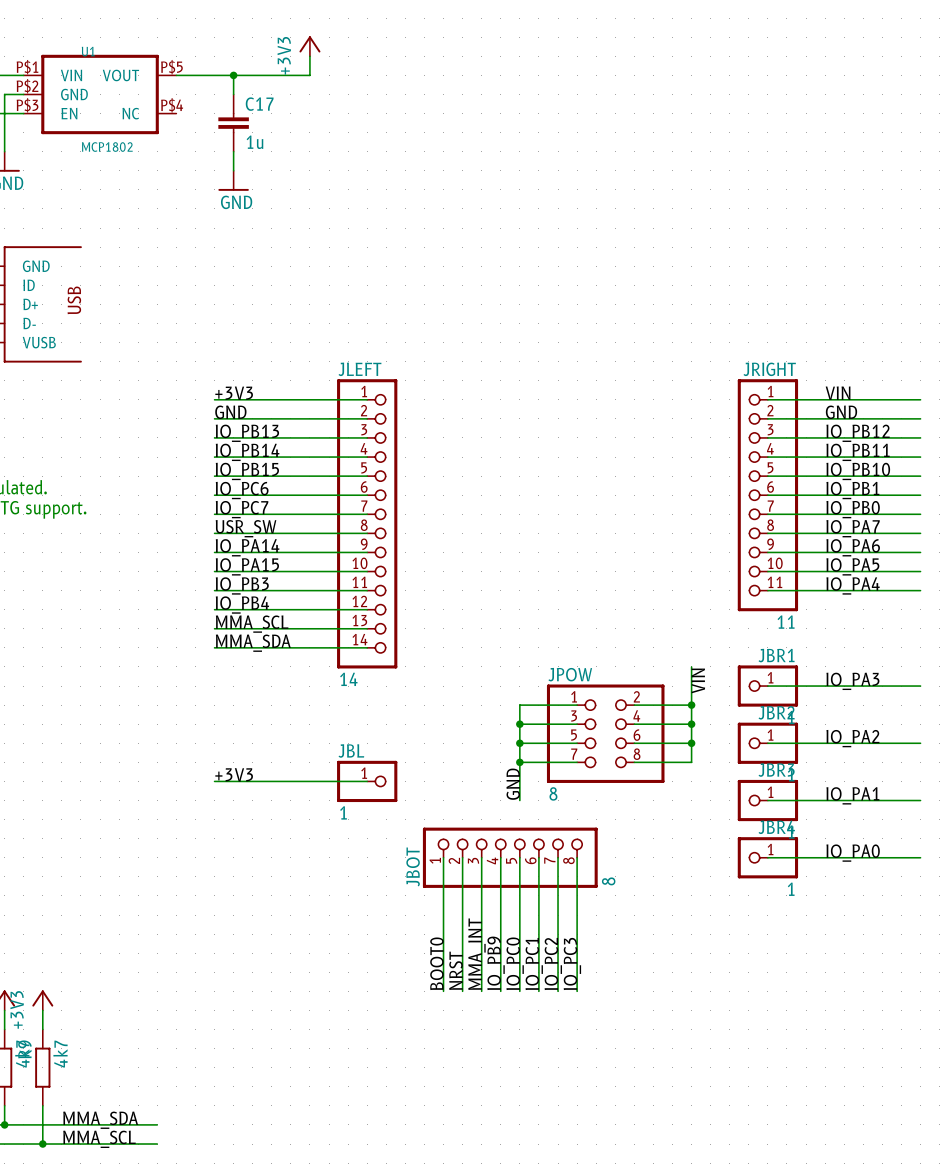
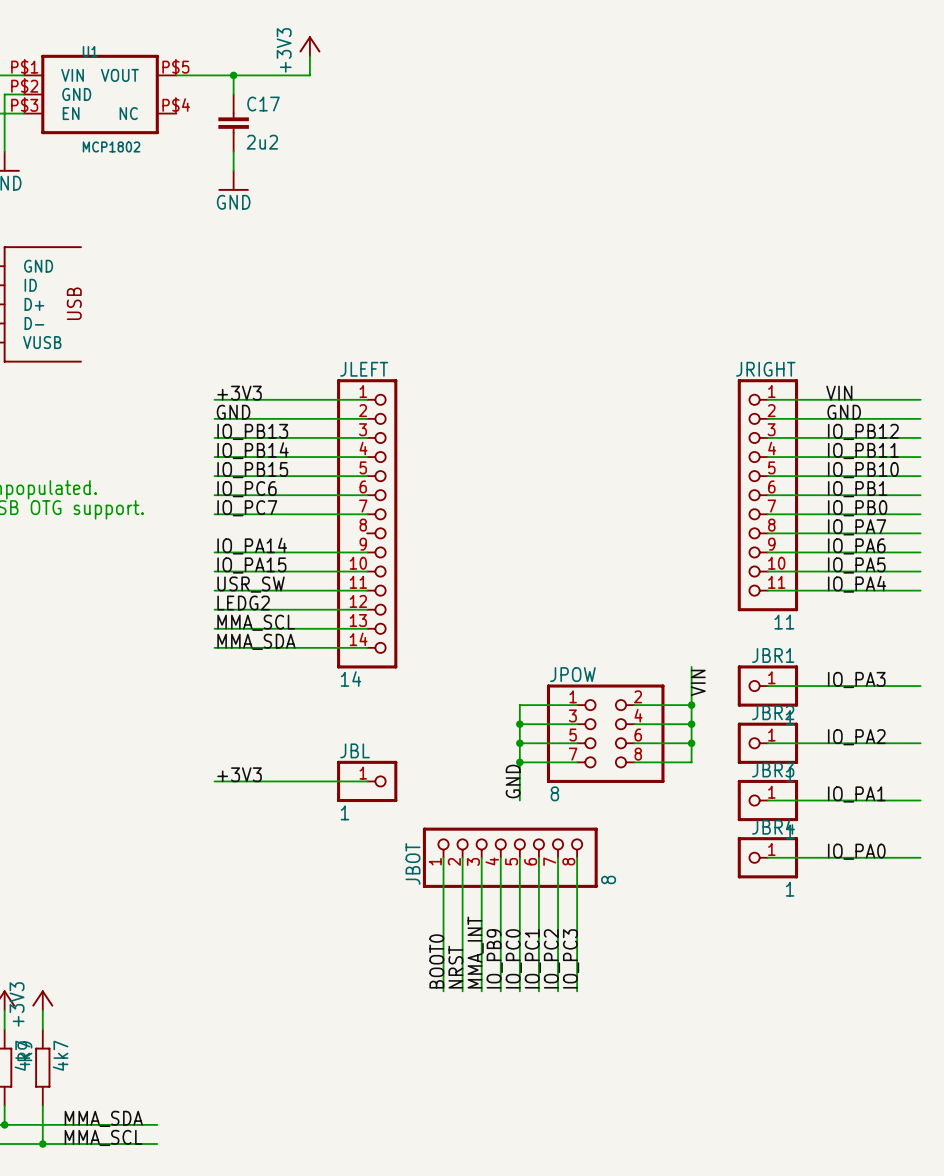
C17 value: 1u (254, 142) -> 2u2 (262, 142)
label: USR_SW (246, 528) -> none
wire: (214, 533) (367, 533) -> none
label: IO_PB3 (242, 585) -> USR_SW (251, 584)
label: IO_PB4 (242, 605) -> LEDG2 (243, 603)

